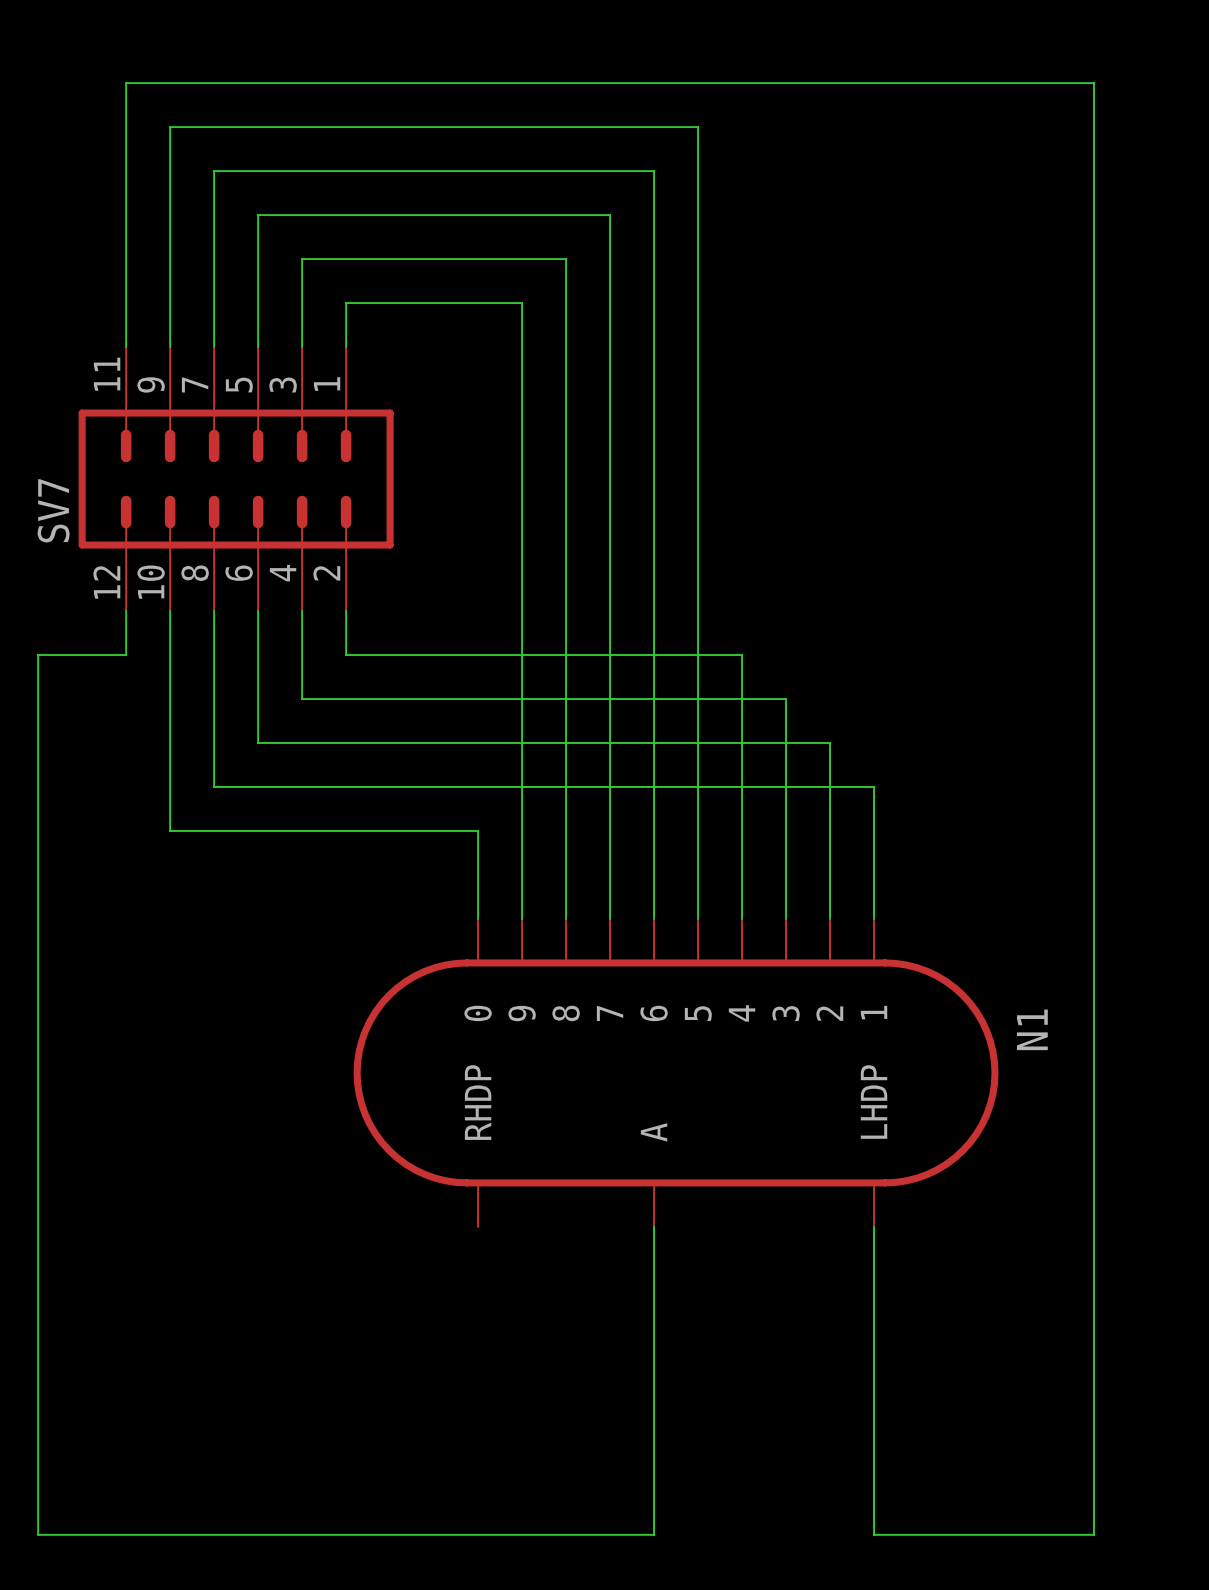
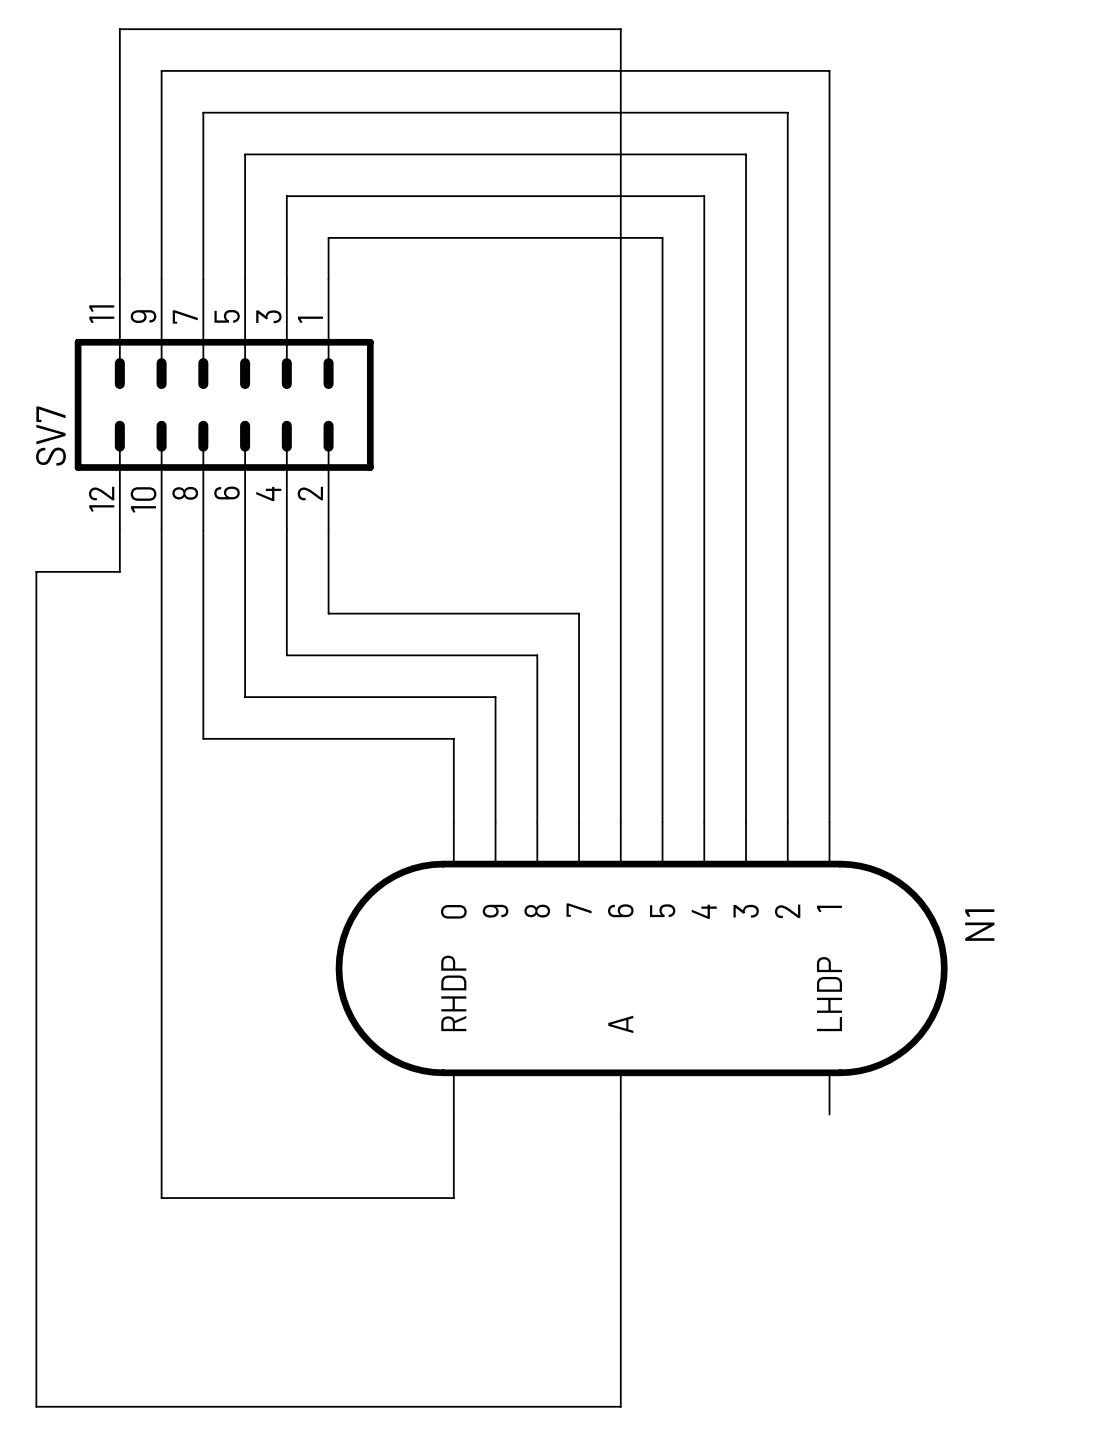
wire: (654, 83) (1093, 83) (1093, 1534) (874, 1534) (874, 1226) -> (620, 29) (620, 112) (787, 112) (787, 655)
wire: (698, 127) (698, 303) -> (495, 237) (662, 237)
wire: (610, 215) (610, 698) (786, 698) -> (579, 154) (746, 154) (746, 613)
wire: (566, 259) (566, 742) (830, 742) -> (537, 196) (704, 196) (704, 571)
wire: (522, 303) (522, 786) (874, 786) -> (662, 70) (829, 70) (829, 697)
wire: (346, 655) (742, 655) -> none
wire: (302, 698) (346, 698) -> (328, 571) (328, 613)
wire: none -> (286, 613) (286, 655)
wire: (258, 742) (302, 742) -> (245, 655) (245, 697)
wire: (214, 786) (258, 786) -> (203, 697) (203, 738)
wire: (170, 830) (214, 830) -> (161, 738) (161, 1198) (453, 1198) (453, 1114)

